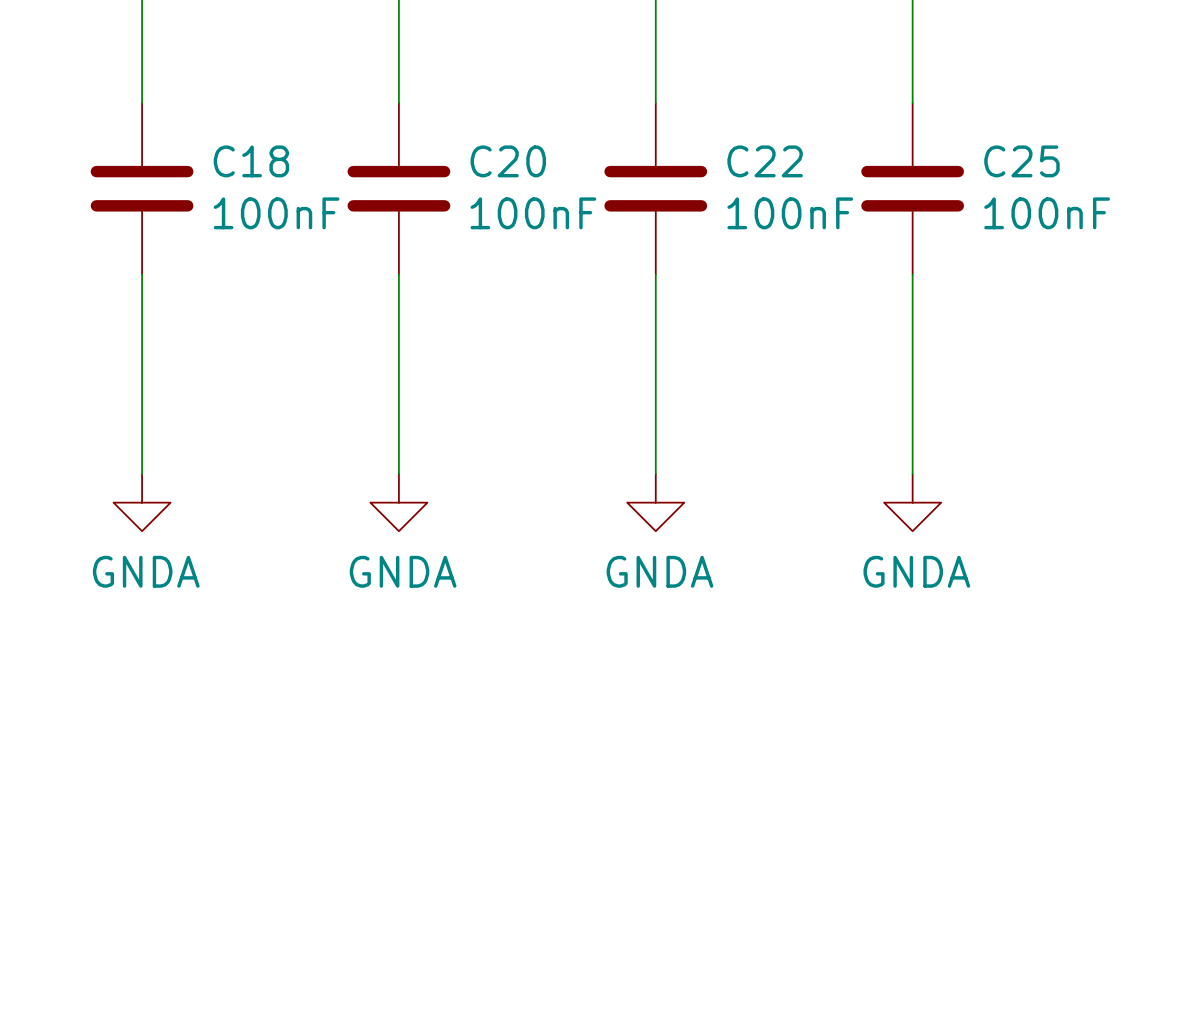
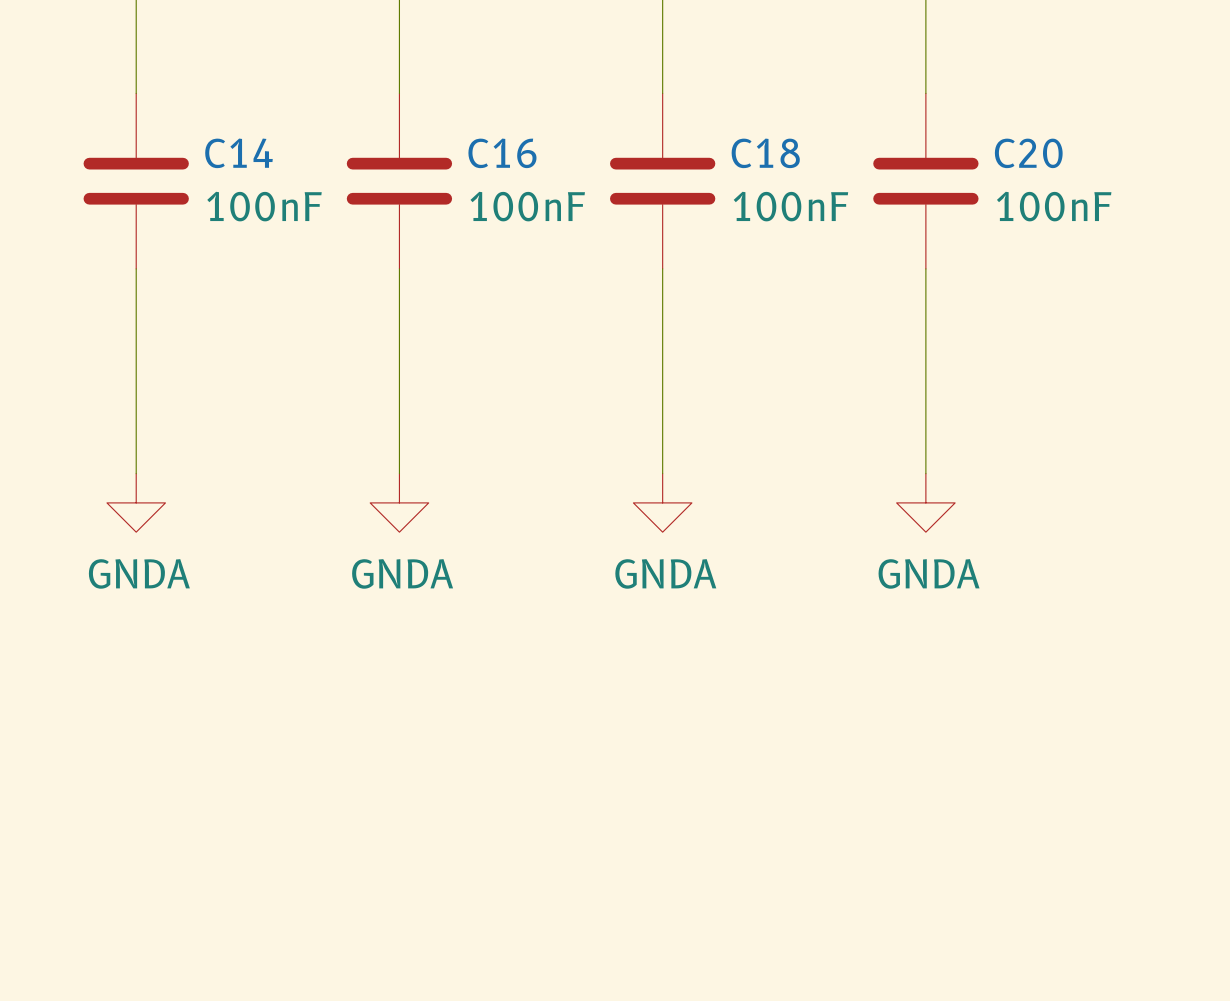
C18 name: C18 (251, 161) -> C14 (238, 153)
C20 name: C20 (508, 161) -> C16 (502, 153)
C22 name: C22 (765, 161) -> C18 (765, 153)
C25 name: C25 (1021, 161) -> C20 (1028, 153)

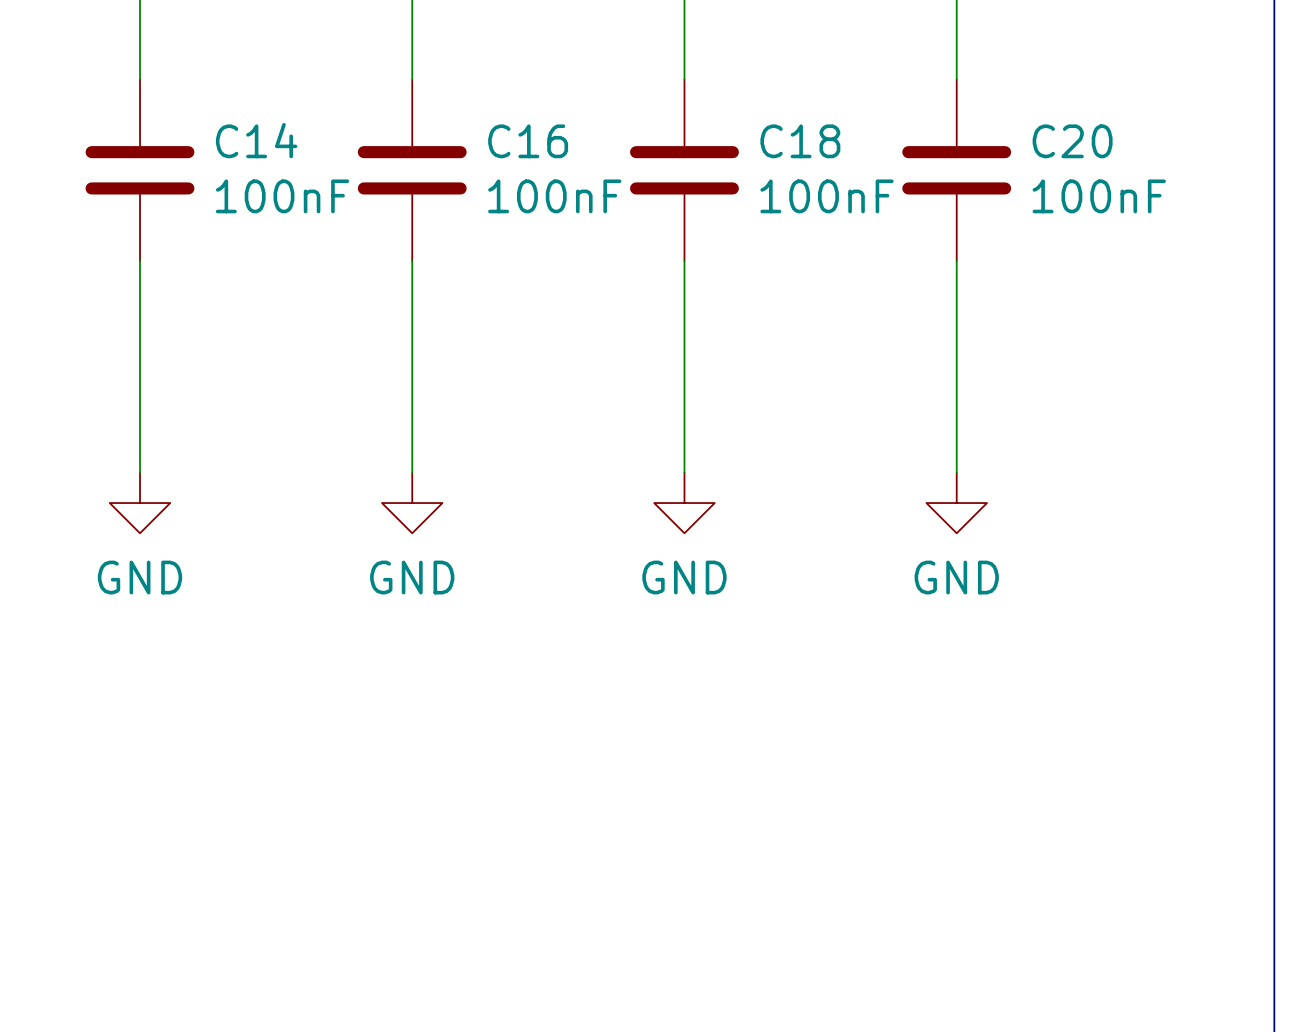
power symbol: GNDA (136, 502) -> GND (139, 503)
power symbol: GNDA (399, 502) -> GND (412, 503)
power symbol: GNDA (662, 502) -> GND (684, 503)
power symbol: GNDA (925, 502) -> GND (956, 503)

